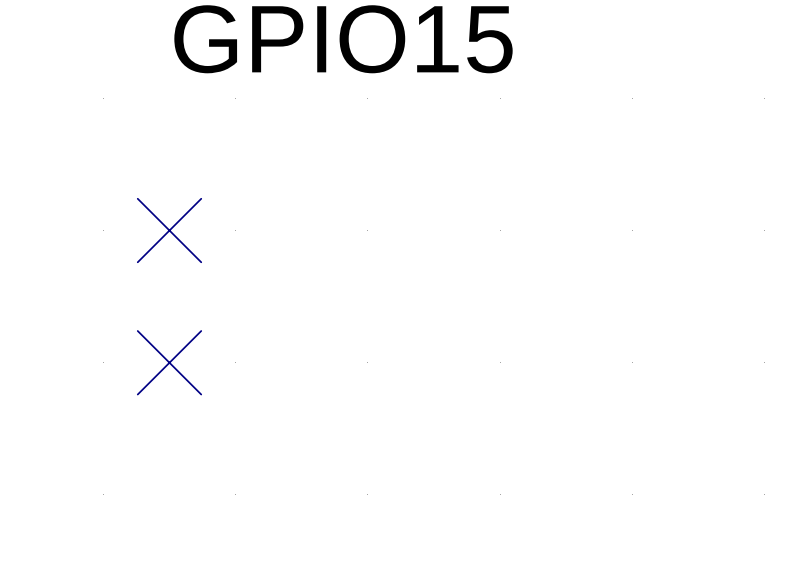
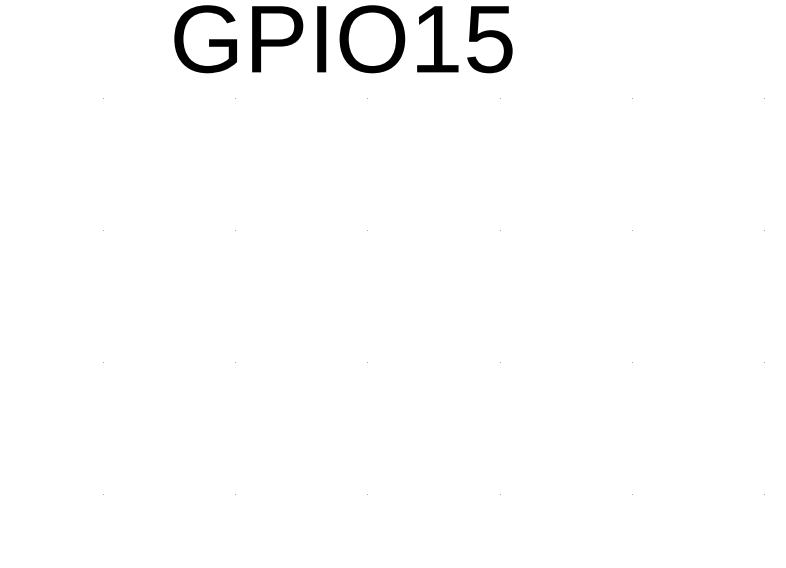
no-connect mark: (169, 230) -> none
no-connect mark: (169, 362) -> none

